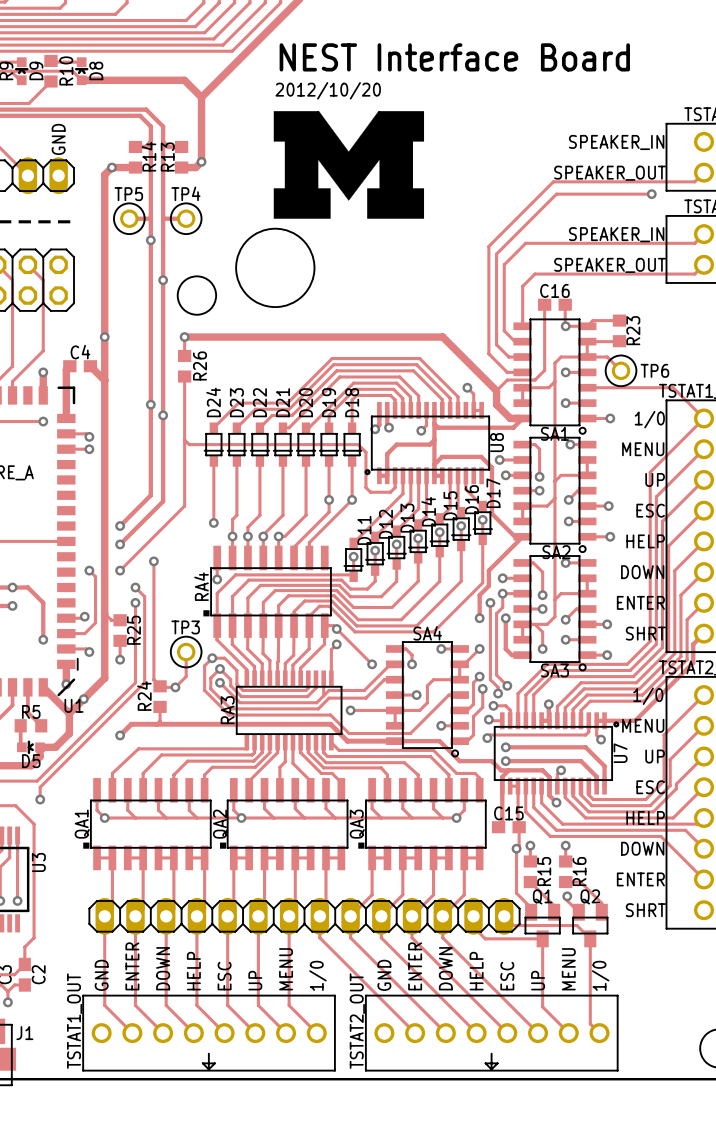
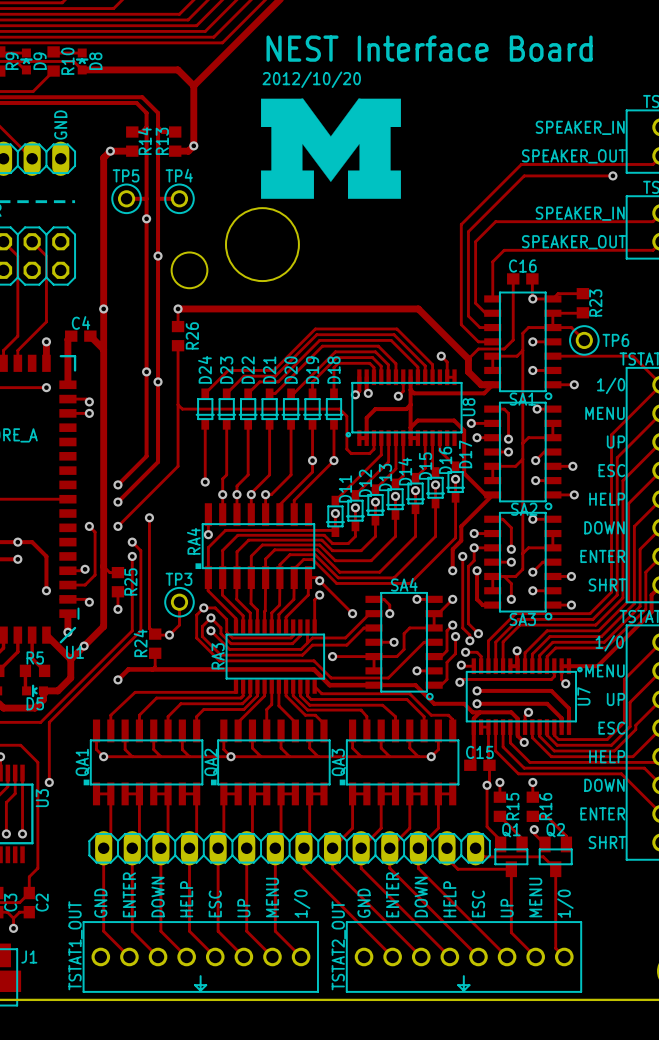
track: (46, 781) (40, 787) (40, 799) -> (49, 722) (49, 782)
via position: (40, 799) -> (49, 782)

